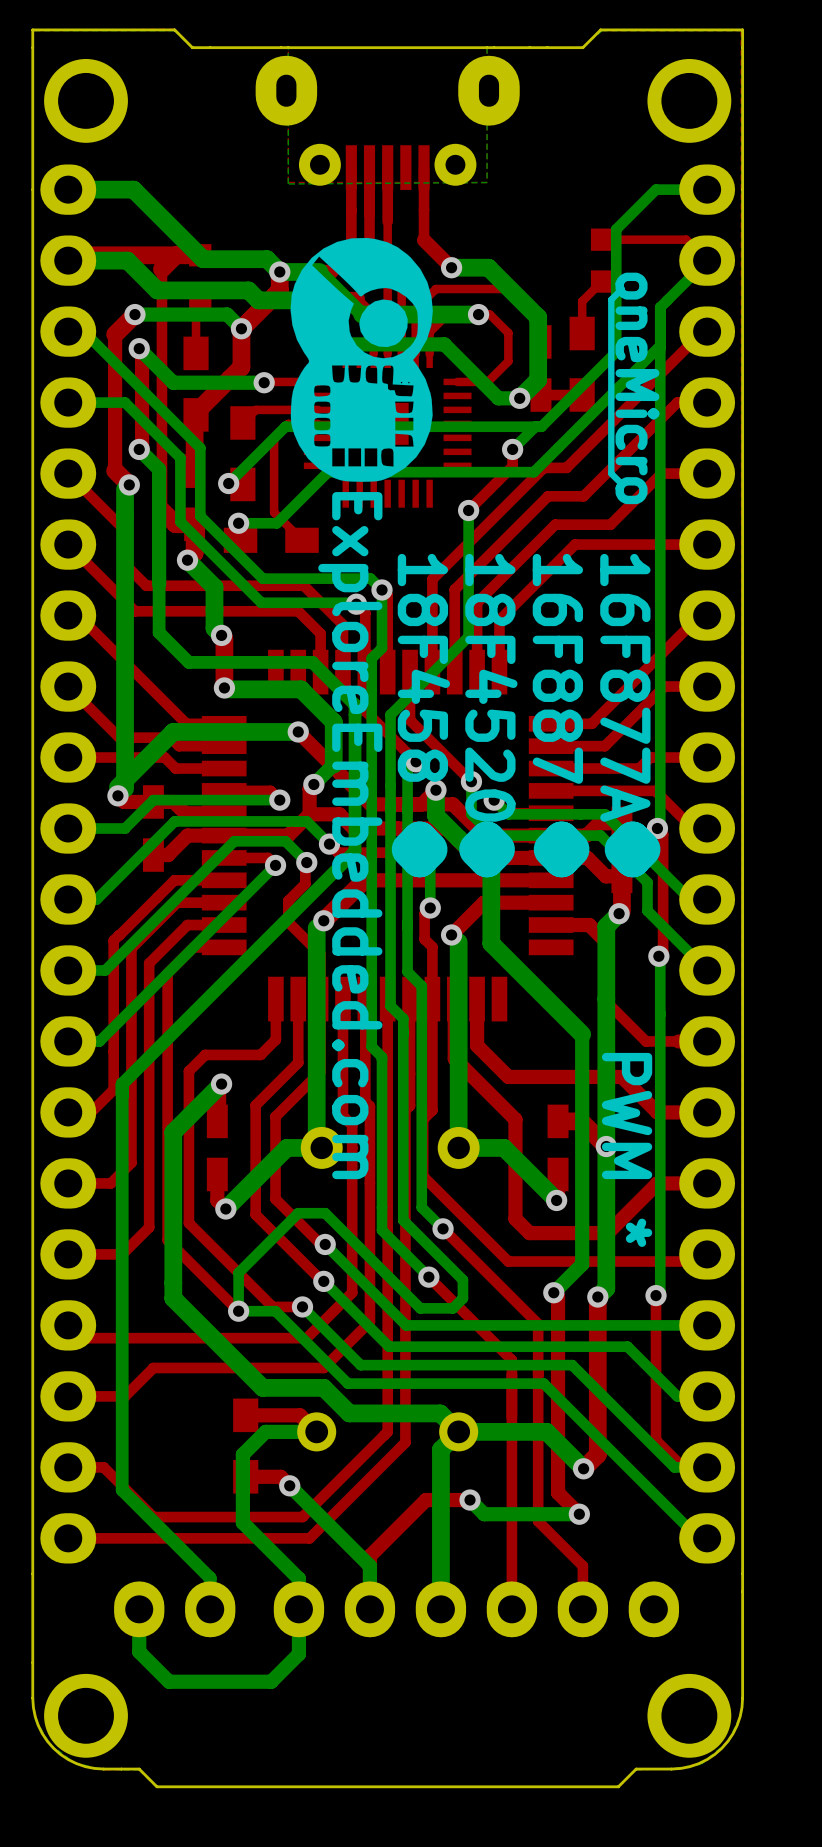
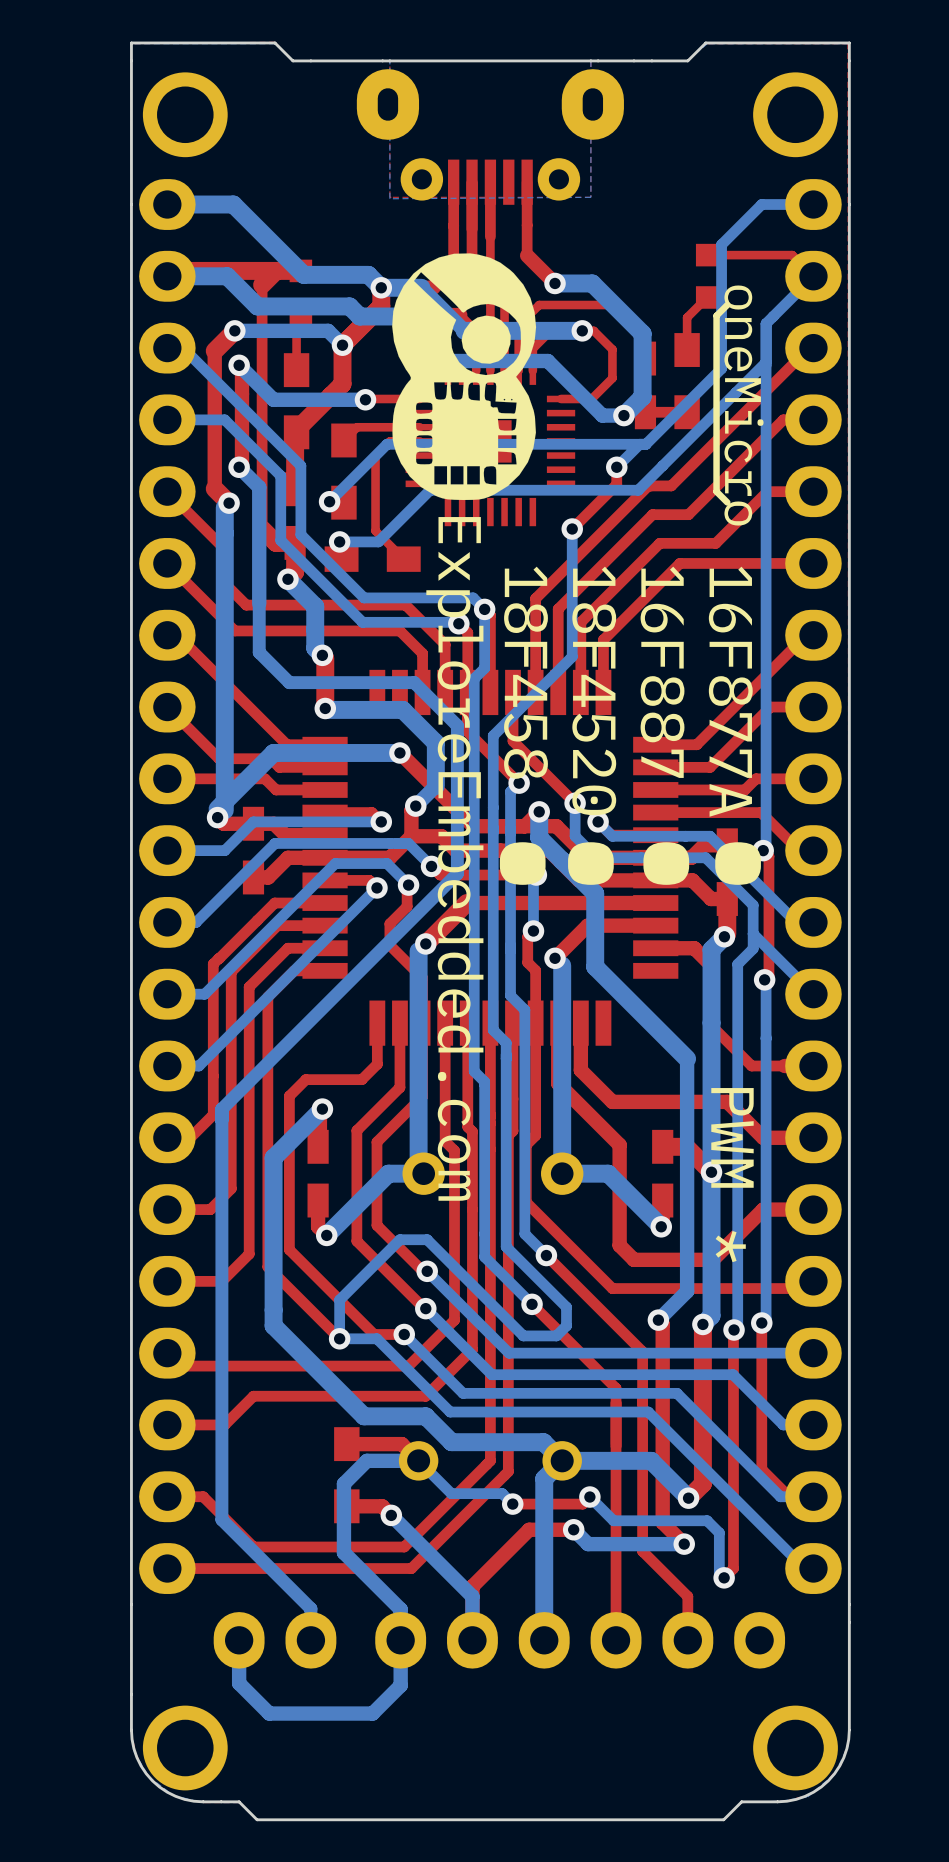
bottom track: none -> (753, 933) (753, 948) (737, 964) (737, 1326) (734, 1329)
top track: none -> (734, 1329) (733, 1568) (724, 1577)
via: none -> (734, 1329)
bottom track: none -> (418, 1460) (451, 1493) (502, 1493) (512, 1504)
top track: none -> (589, 1497) (582, 1504) (512, 1504)
bottom track: none -> (589, 1497) (613, 1520) (707, 1520) (719, 1532) (719, 1573) (724, 1577)
via: none -> (589, 1497)
via: none -> (512, 1504)
via: none -> (724, 1577)

